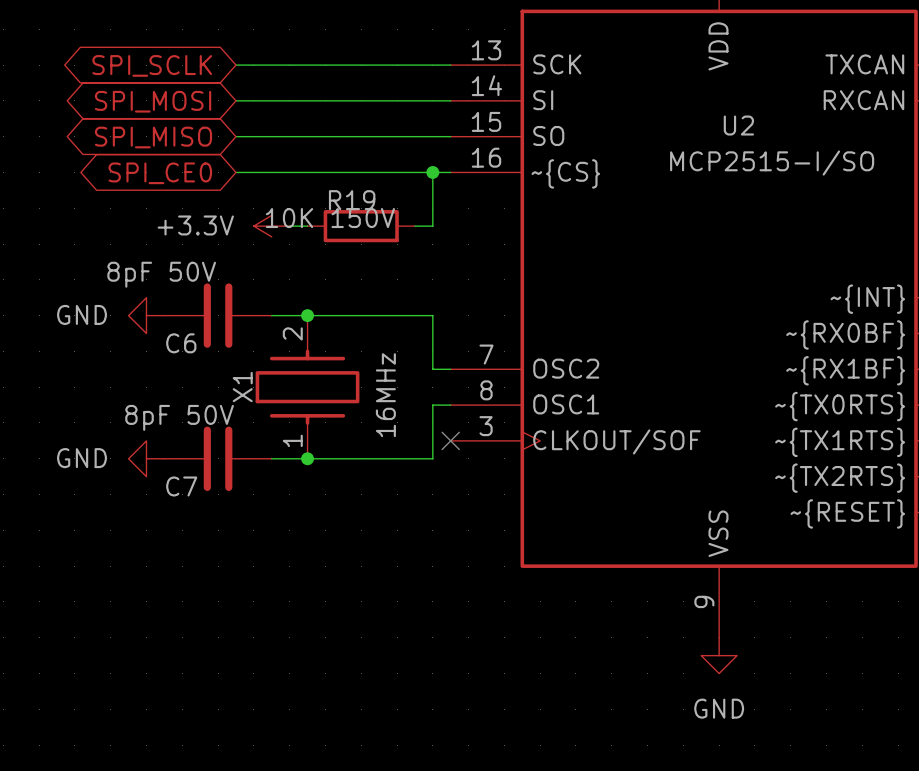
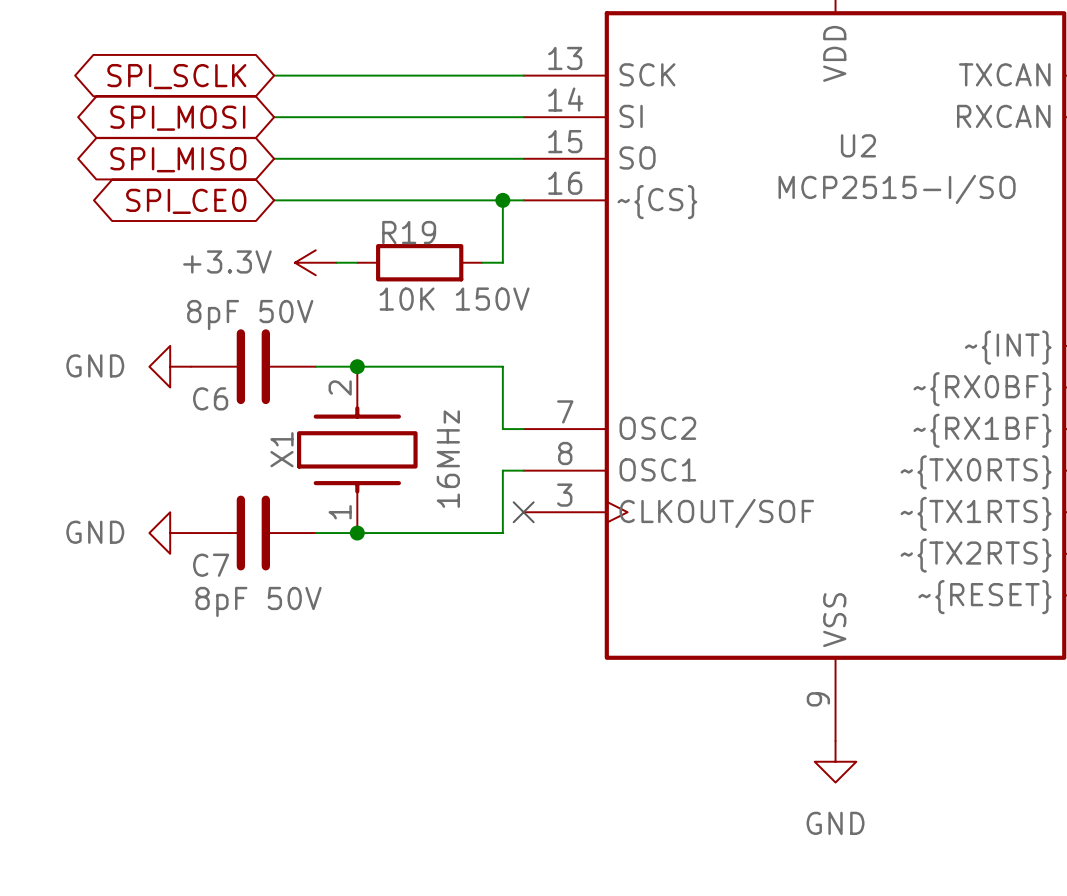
R19 value position: 10K 150V (330, 218) -> 10K 150V (454, 299)
C6 value position: 8pF 50V (161, 274) -> 8pF 50V (250, 315)
C7 value position: 8pF 50V (179, 417) -> 8pF 50V (258, 601)

